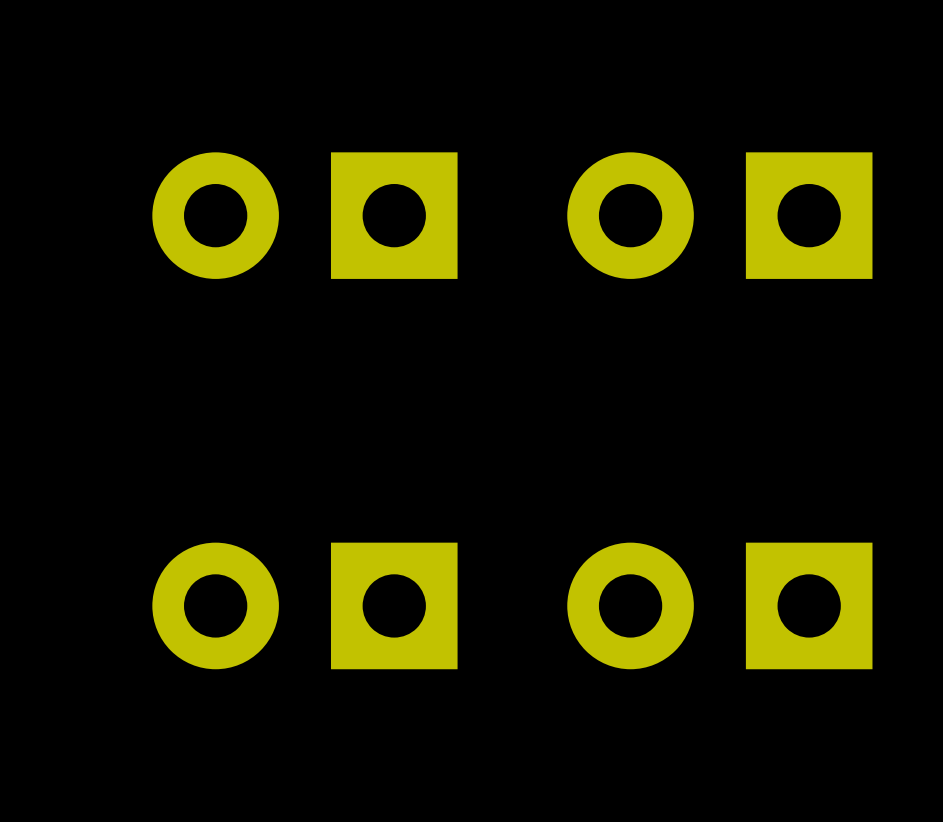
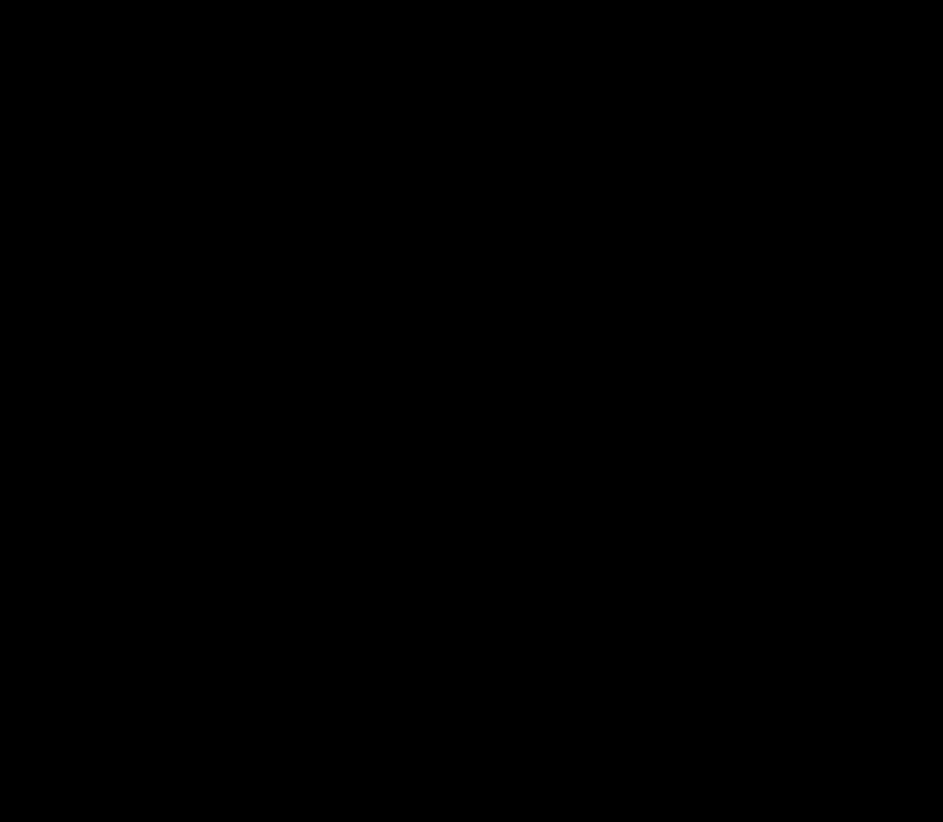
part: (304, 215) -> none
part: (719, 215) -> none
part: (304, 605) -> none
part: (719, 605) -> none

